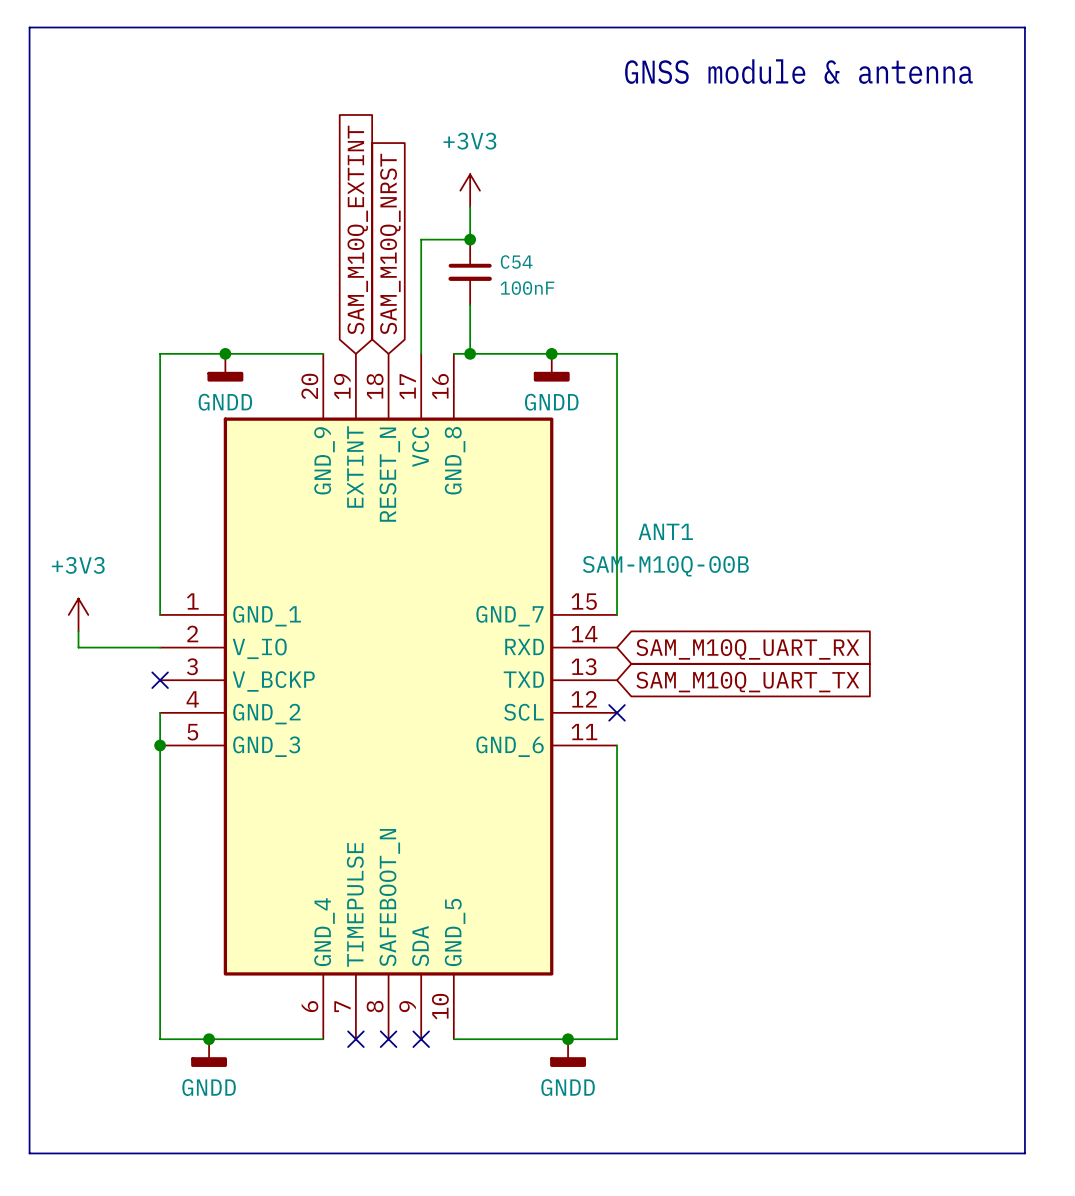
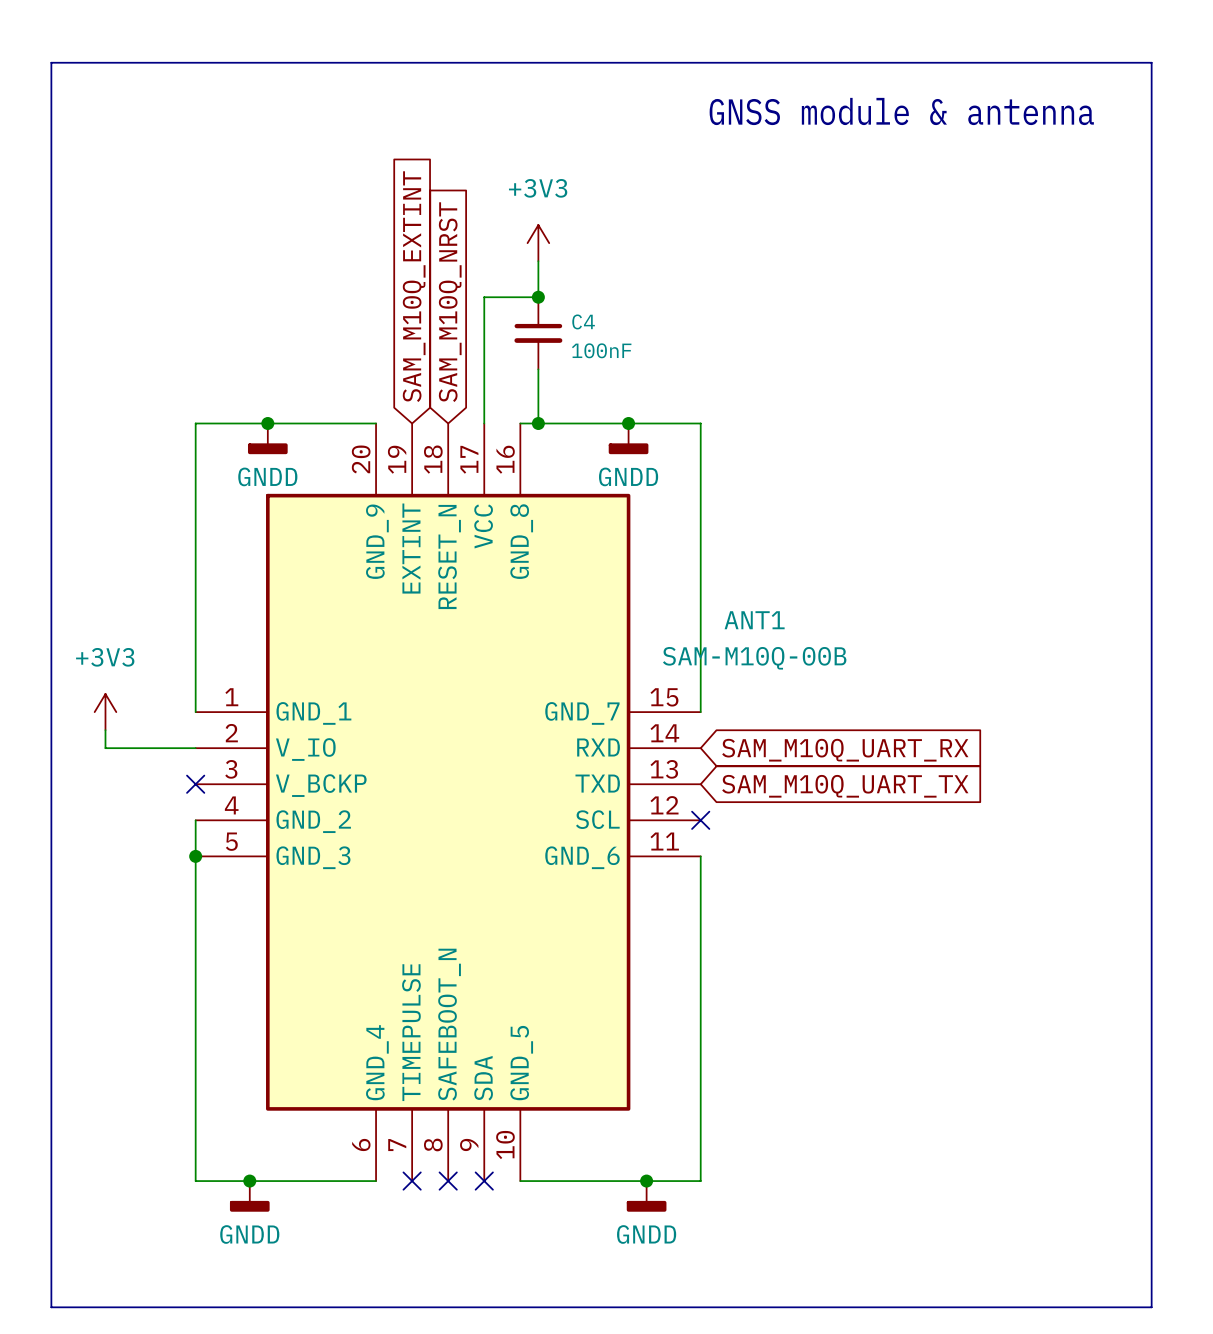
C54 name: C54 (516, 261) -> C4 (583, 321)

